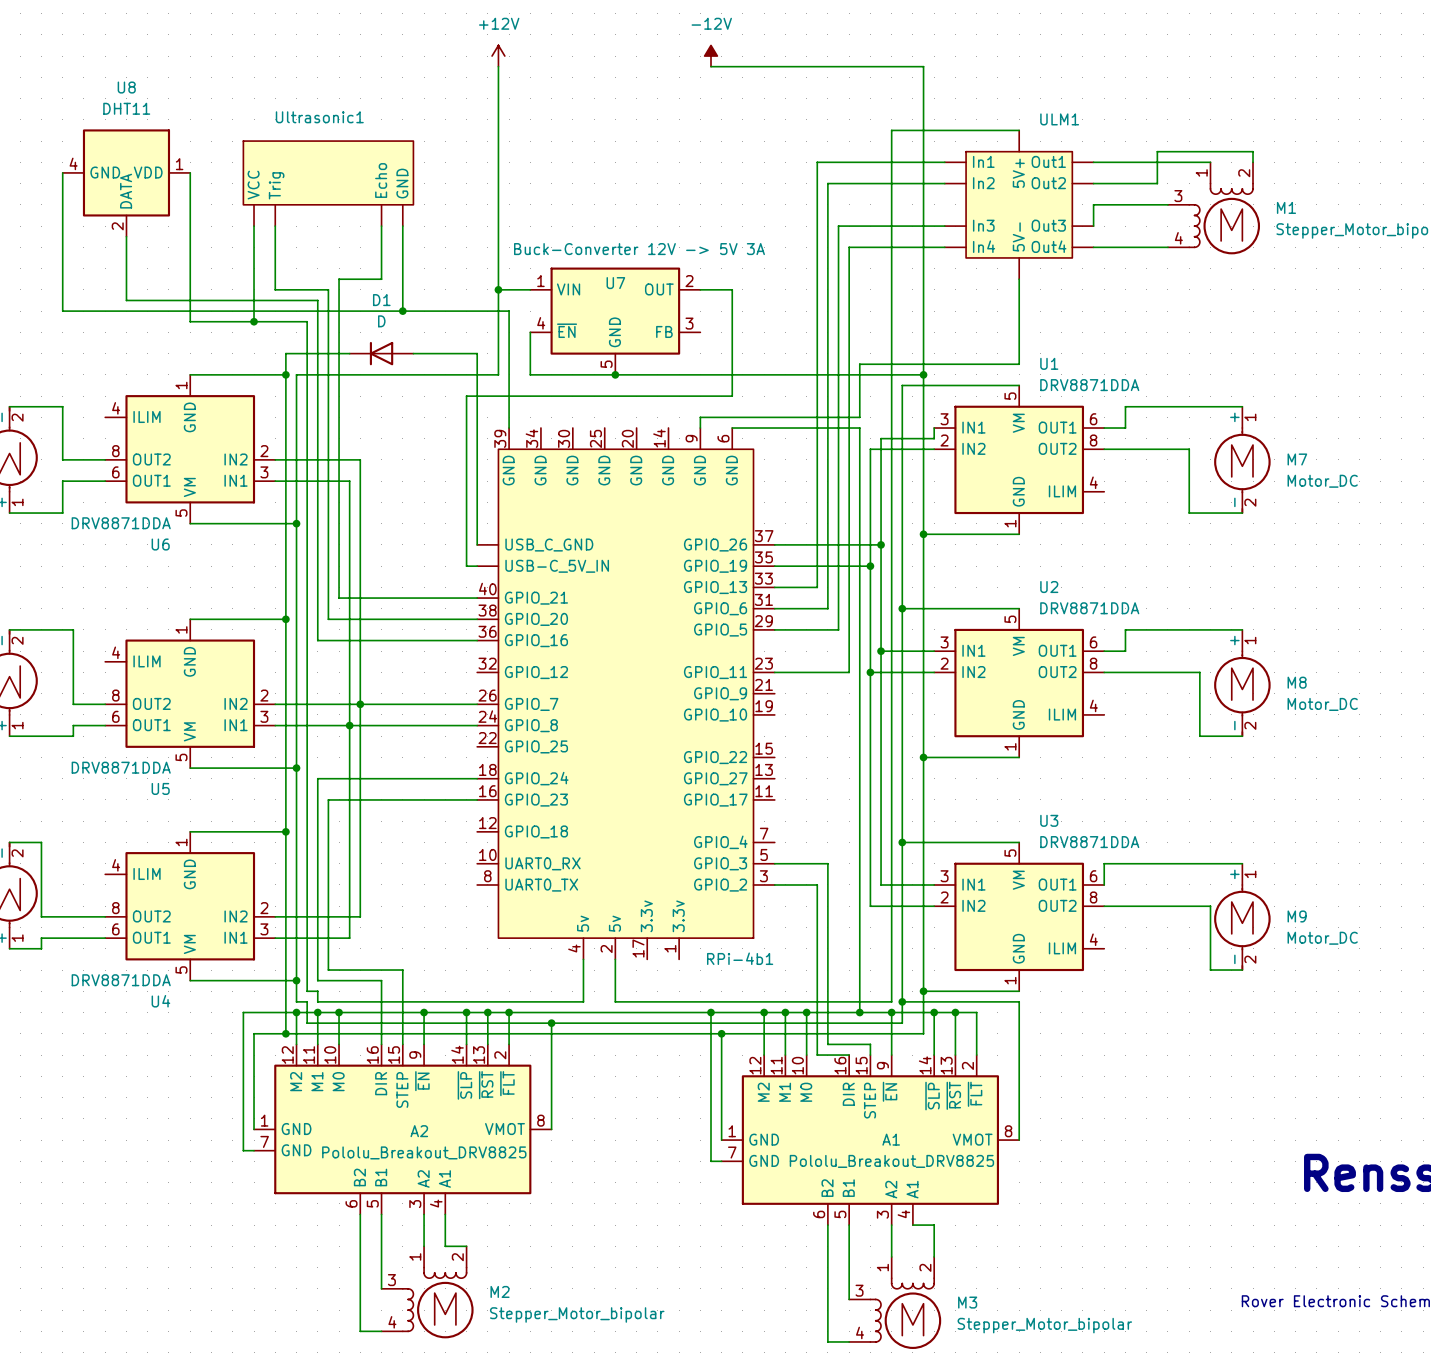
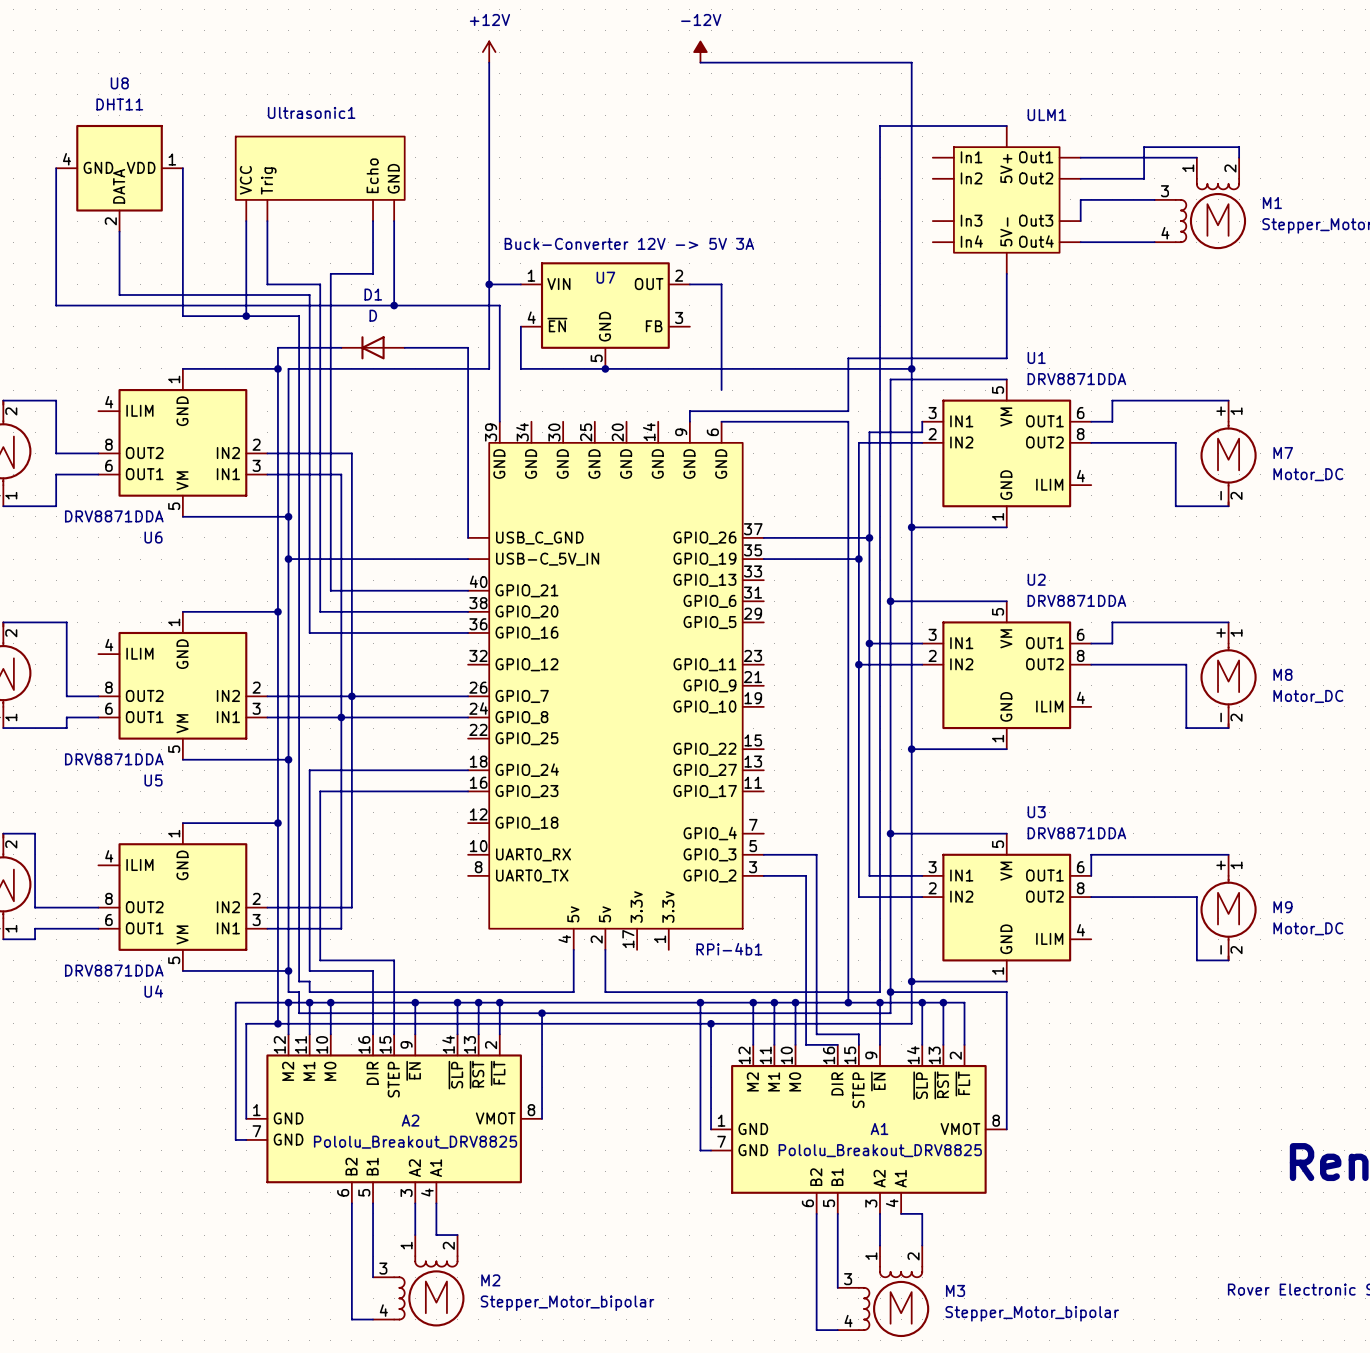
wire: (944, 162) (817, 162) (817, 587) (774, 587) -> none
wire: (944, 183) (827, 183) (827, 608) (774, 608) -> none
wire: (944, 226) (838, 226) (838, 629) (774, 629) -> none
wire: (944, 247) (849, 247) (849, 672) (774, 672) -> none
wire: (732, 396) (466, 396) (466, 566) -> (288, 559) (457, 559)
junction: none -> (288, 559)

